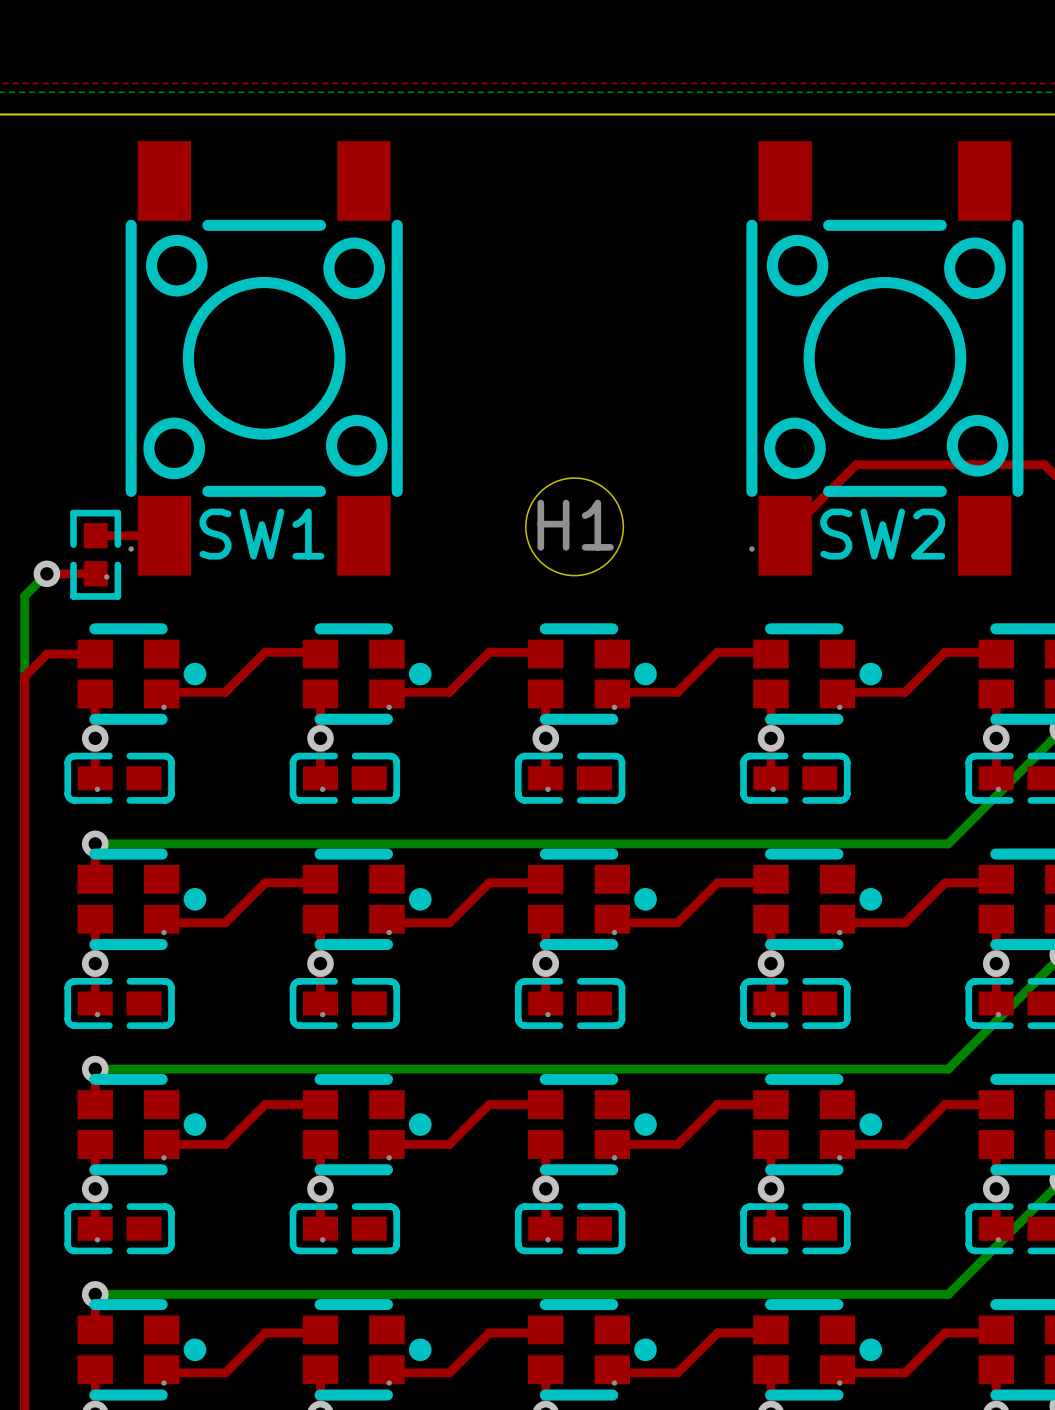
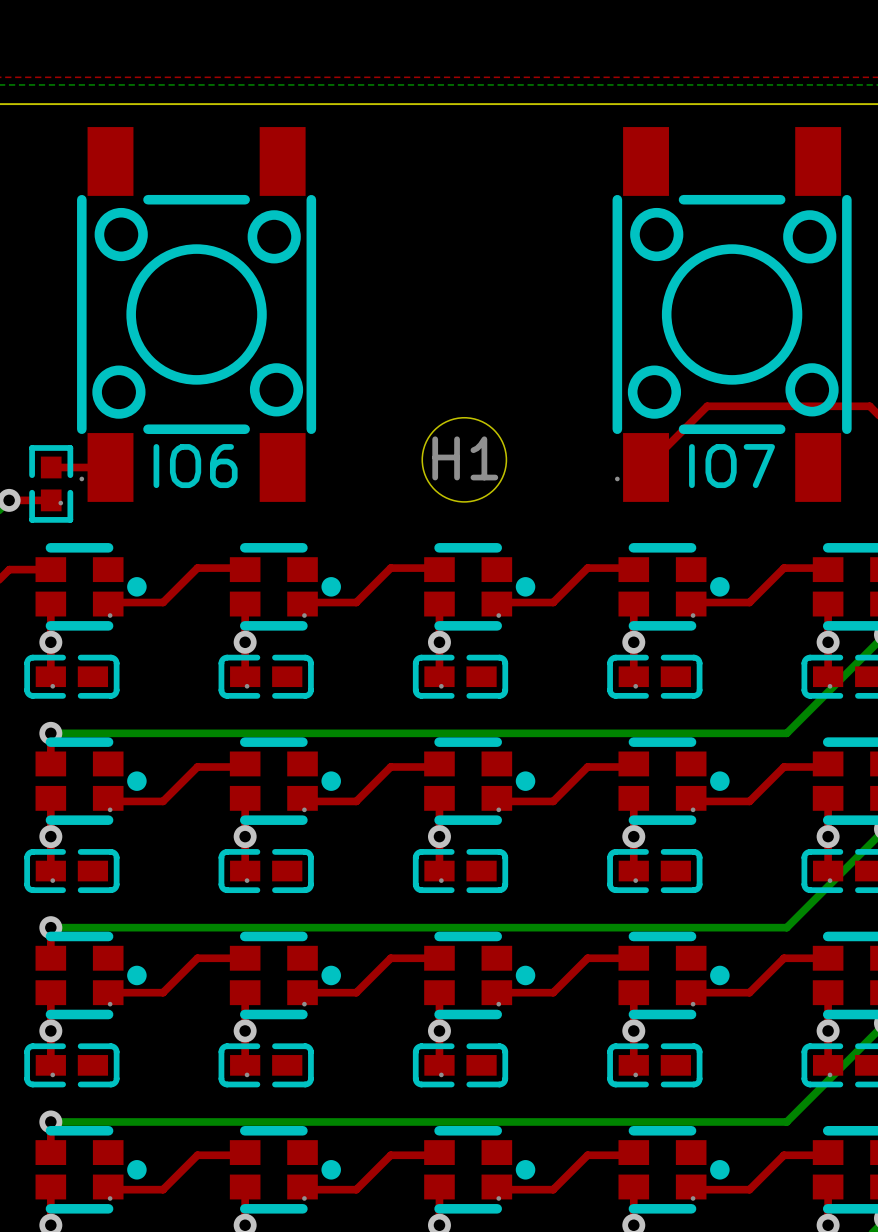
SW1 name: SW1 (261, 534) -> none
SW1 text: none -> IO6 (195, 466)
SW2 name: SW2 (882, 534) -> none
SW2 text: none -> IO7 (732, 466)

